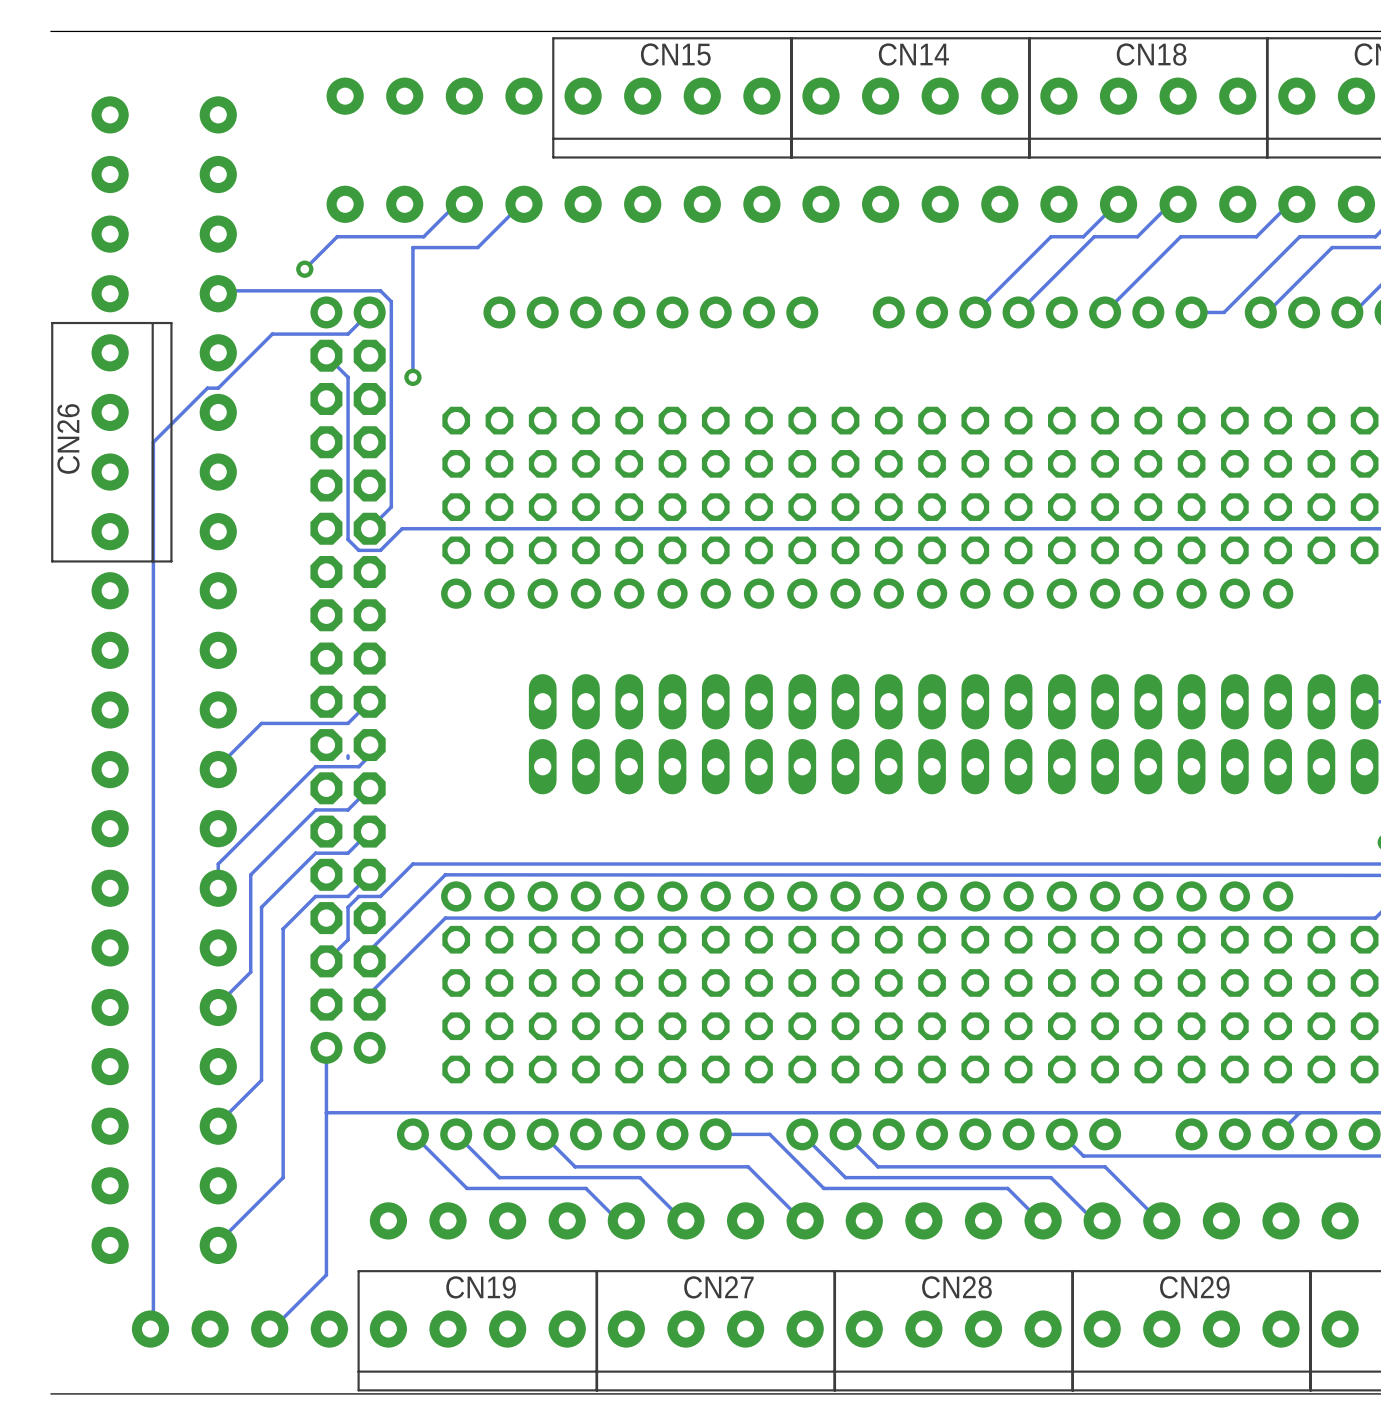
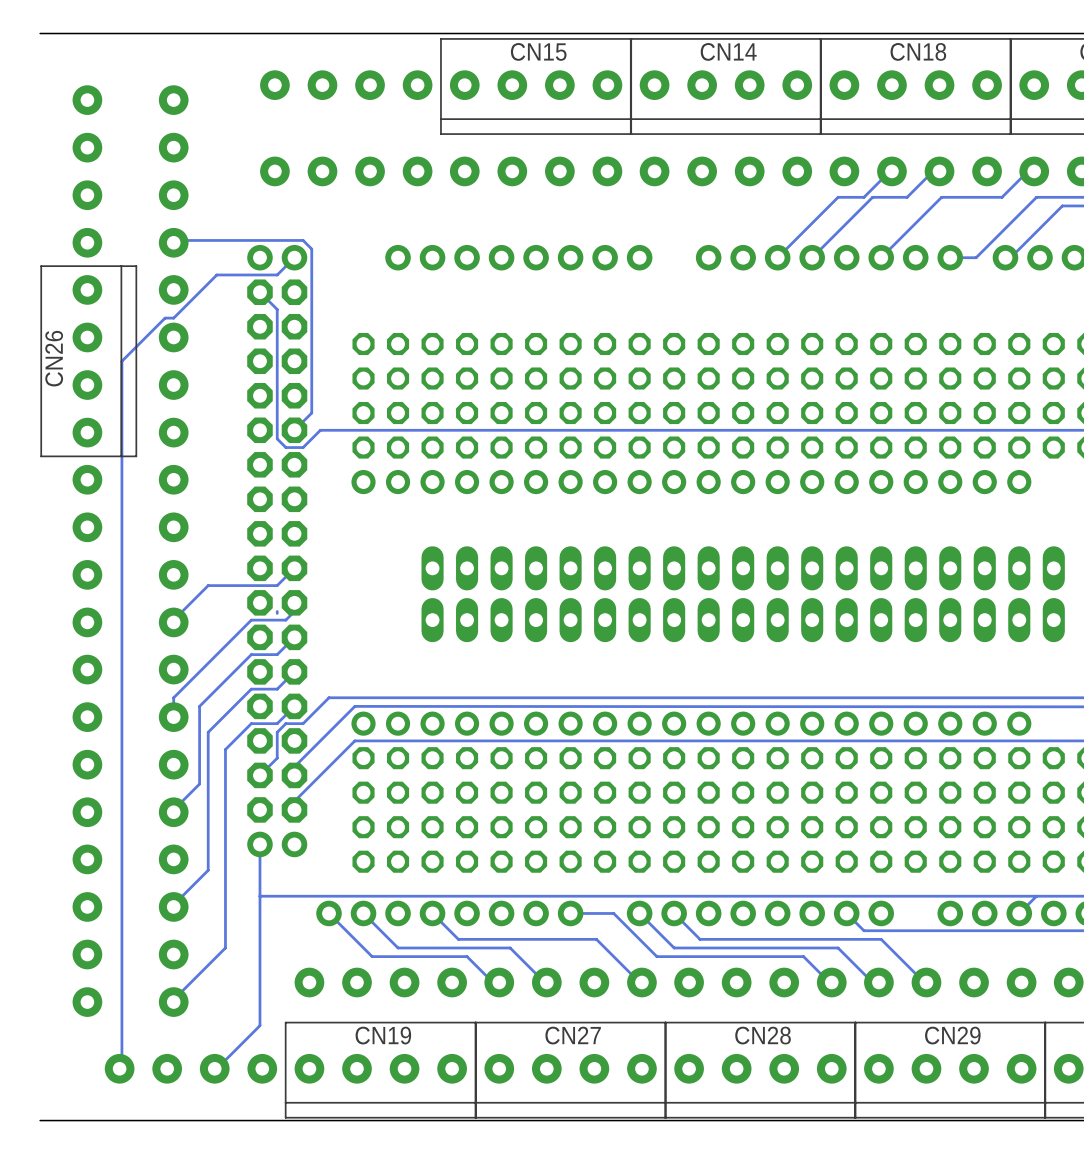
track: (464, 204) (456, 204) (423, 236) (337, 236) (304, 269) -> none
track: (523, 204) (521, 204) (477, 247) (412, 247) (412, 377) -> none
via: (304, 269) -> none
via: (412, 377) -> none

